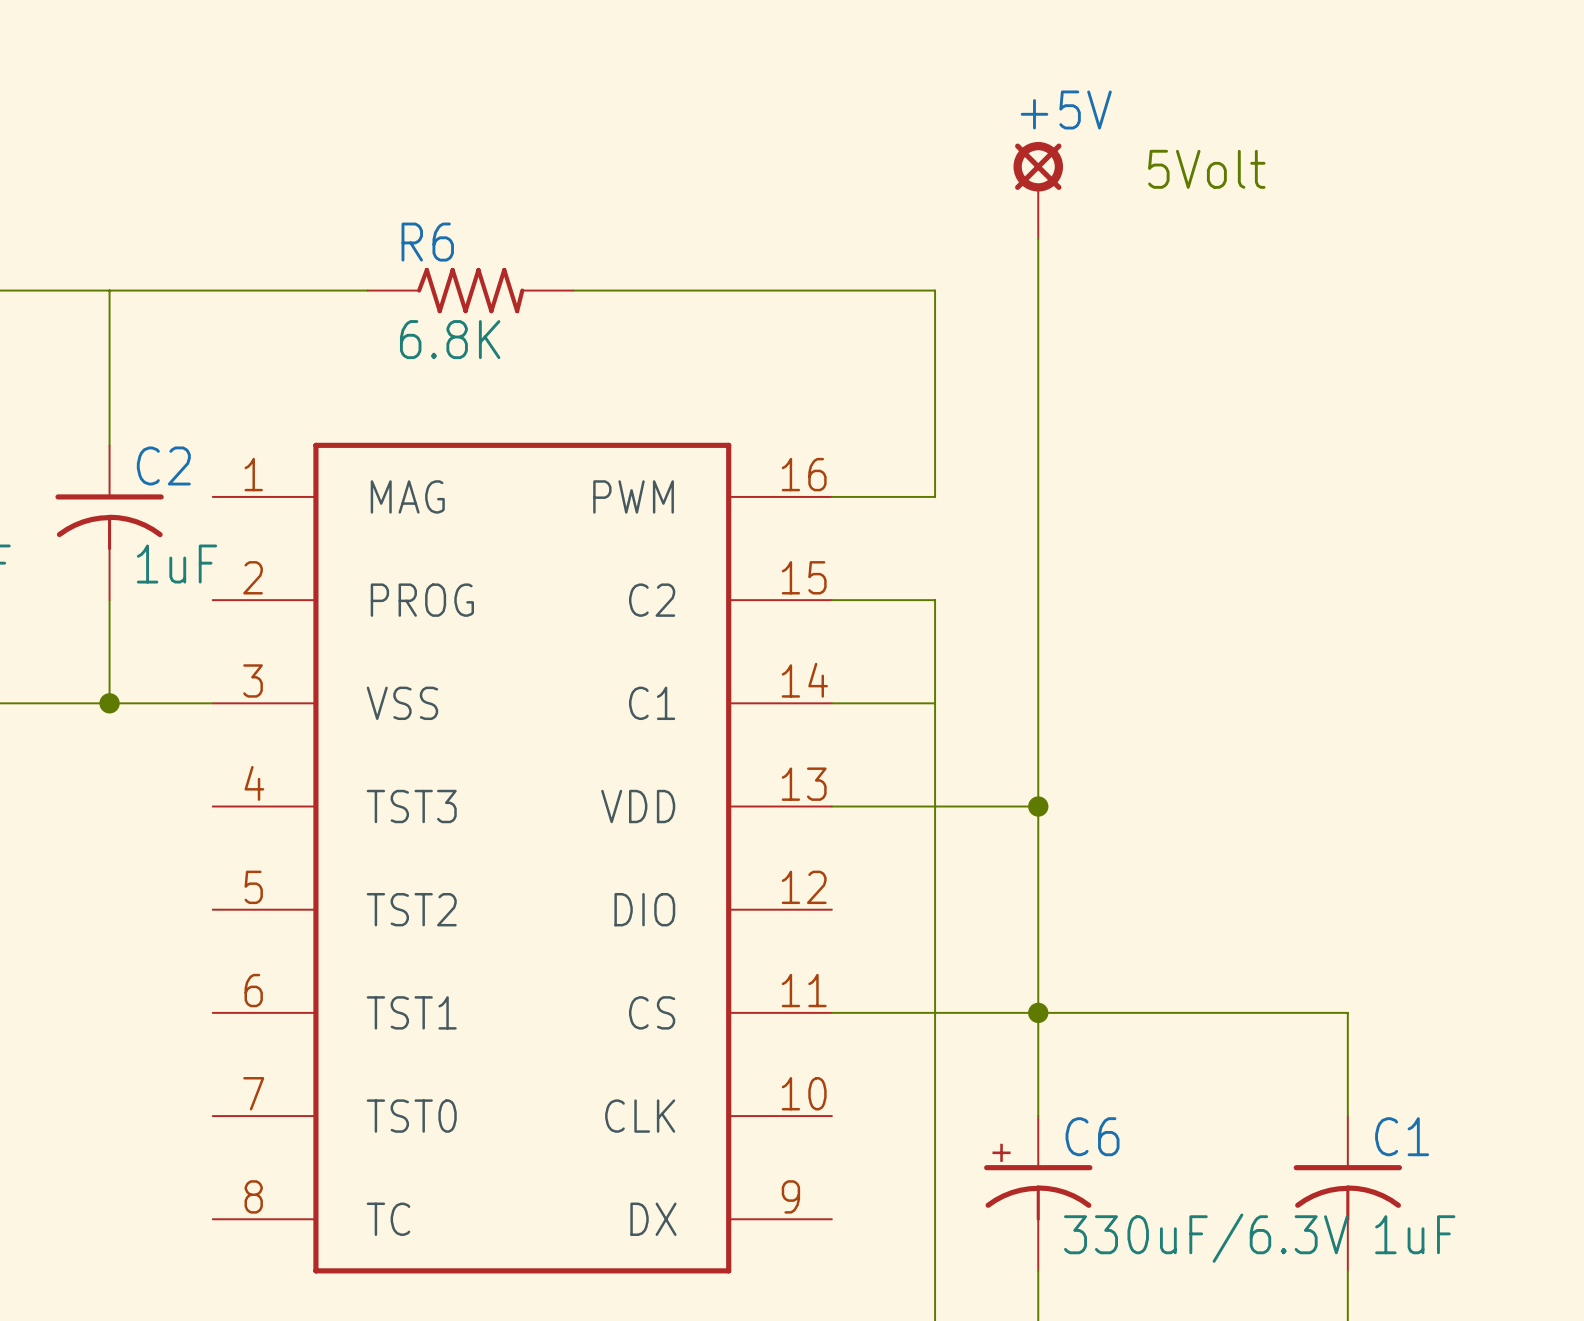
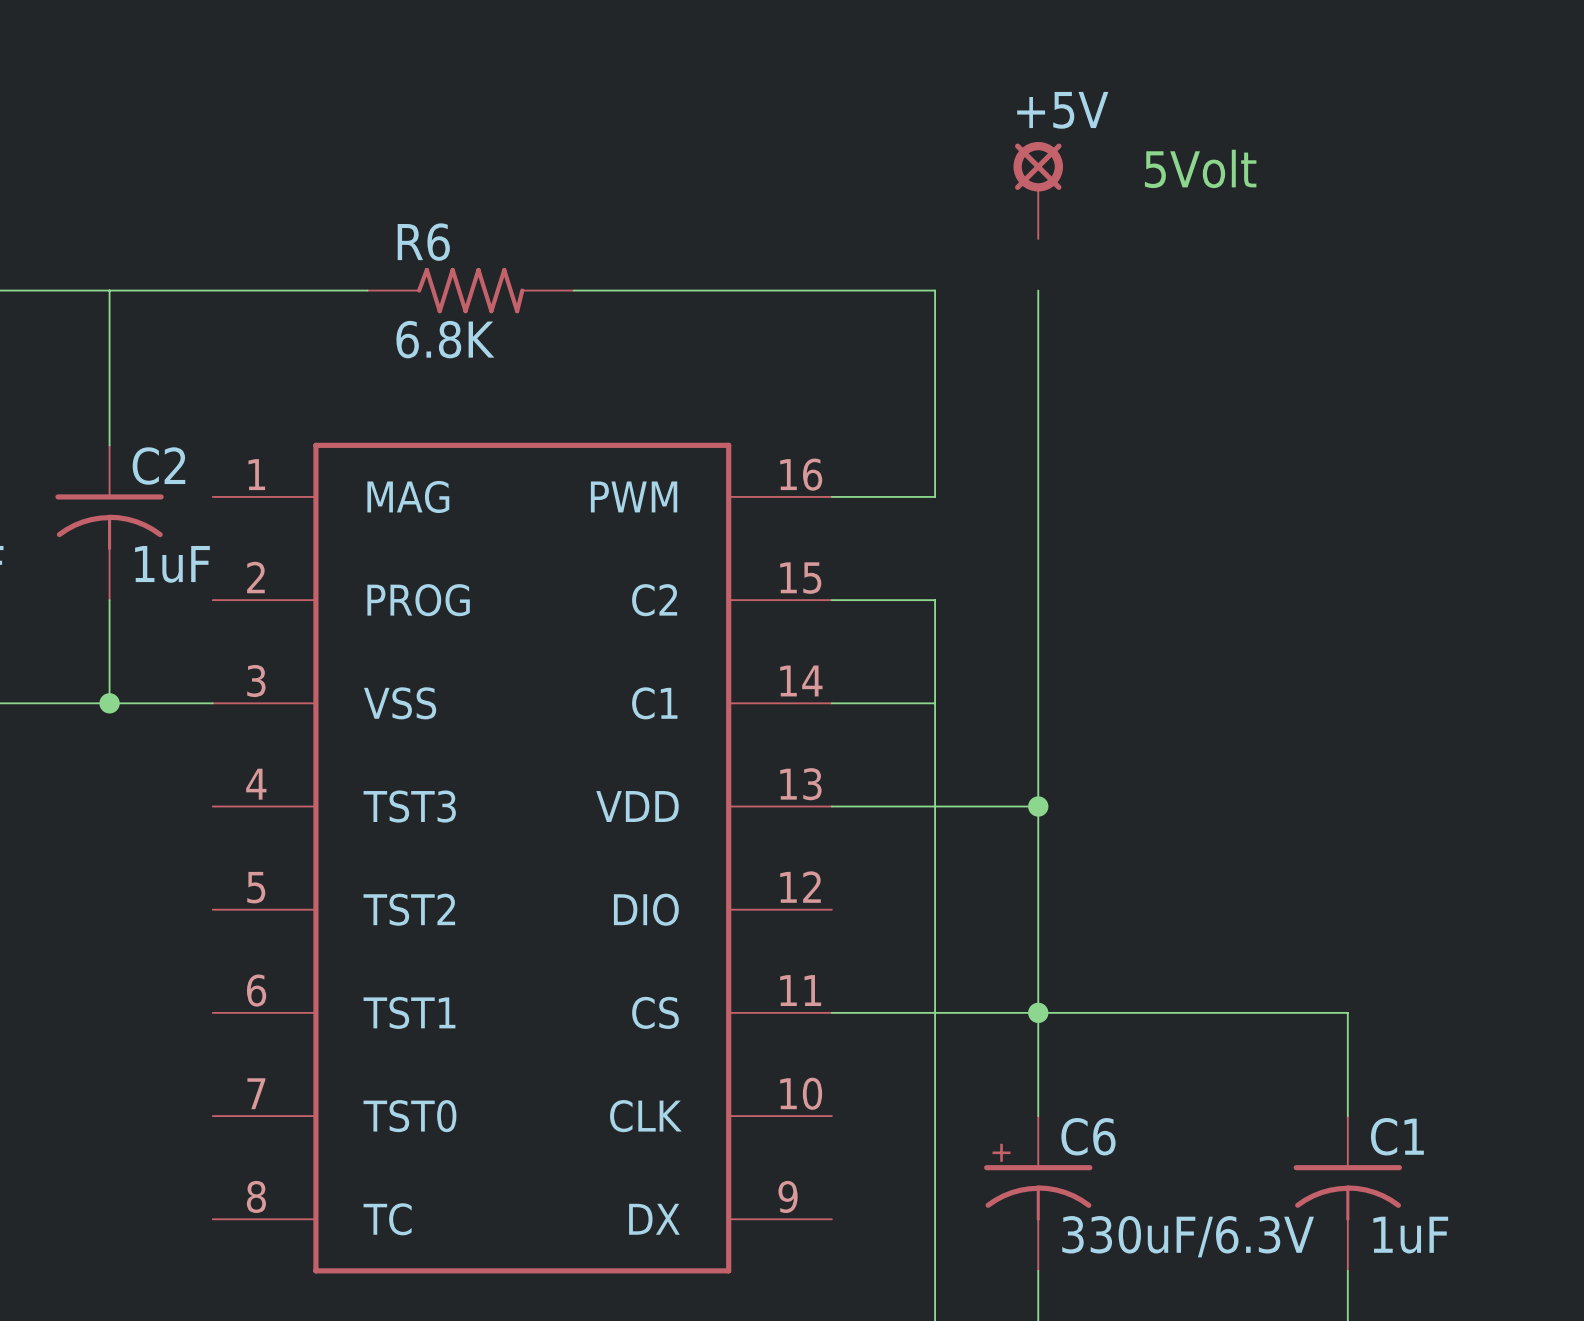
wire: (1038, 238) (1038, 290) -> none

